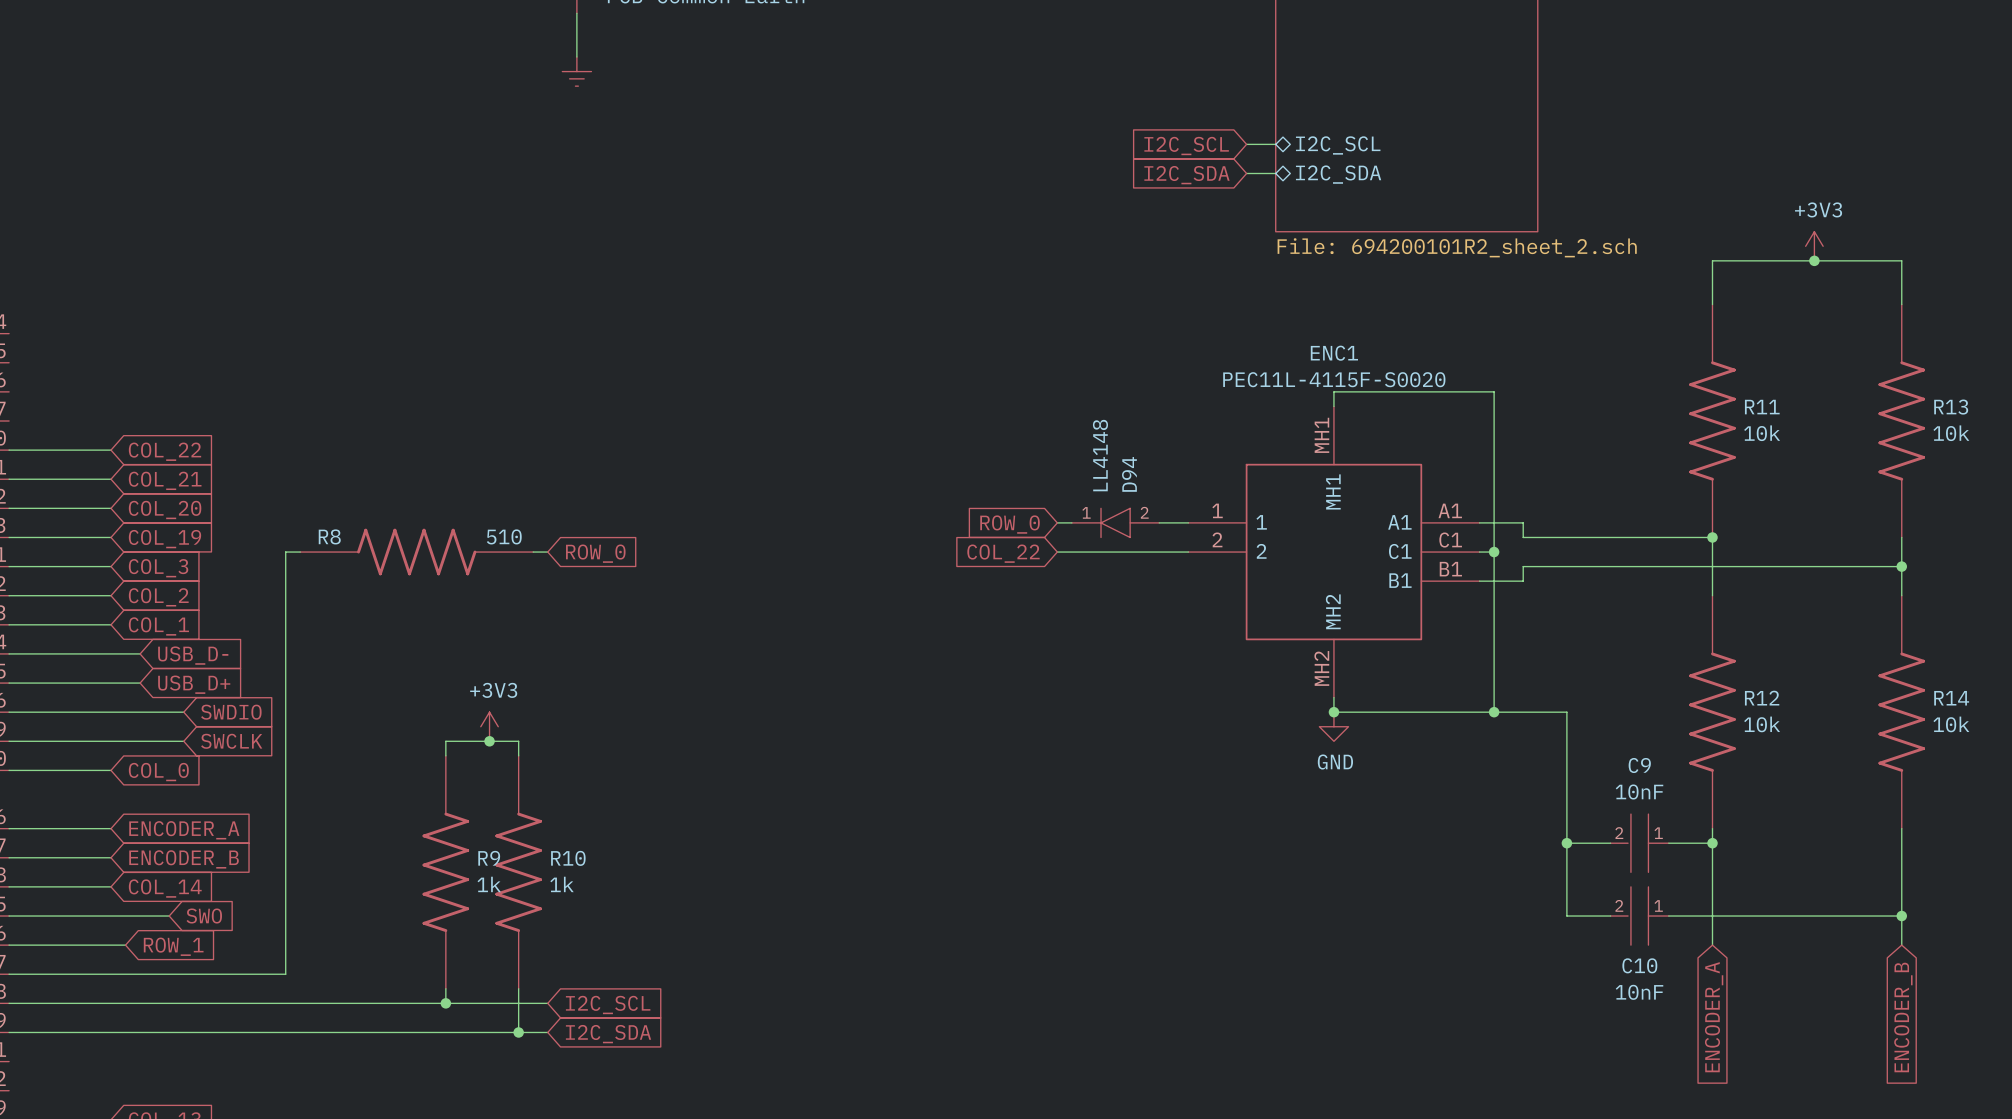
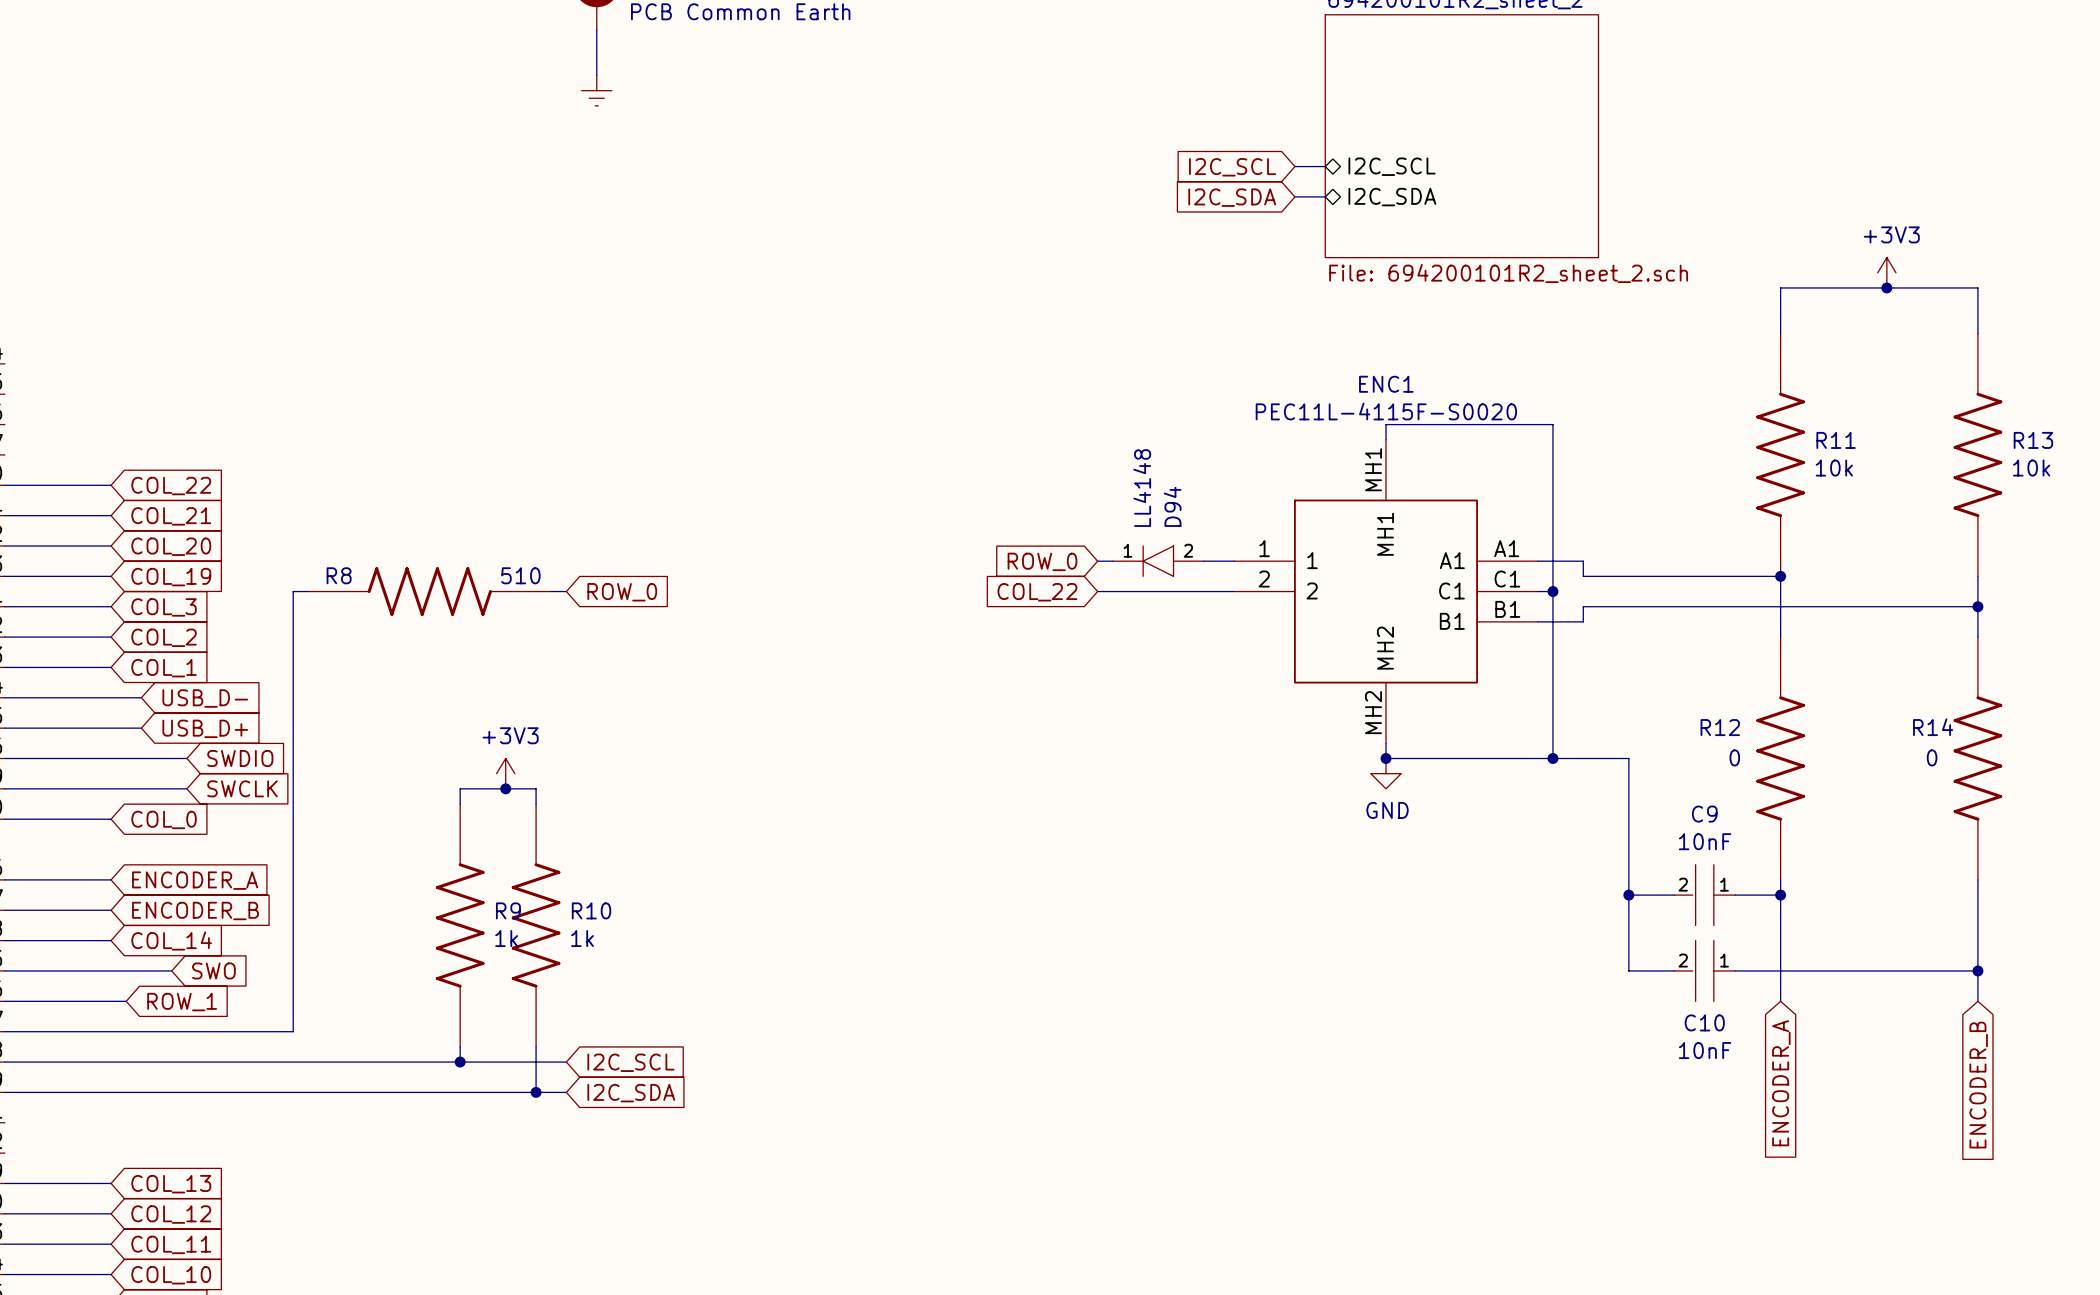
R12 name position: R12 (1762, 698) -> R12 (1720, 727)
R14 name position: R14 (1951, 698) -> R14 (1933, 727)
R12 text: 10k (1762, 724) -> 0 (1734, 757)
R14 text: 10k (1951, 724) -> 0 (1932, 757)

